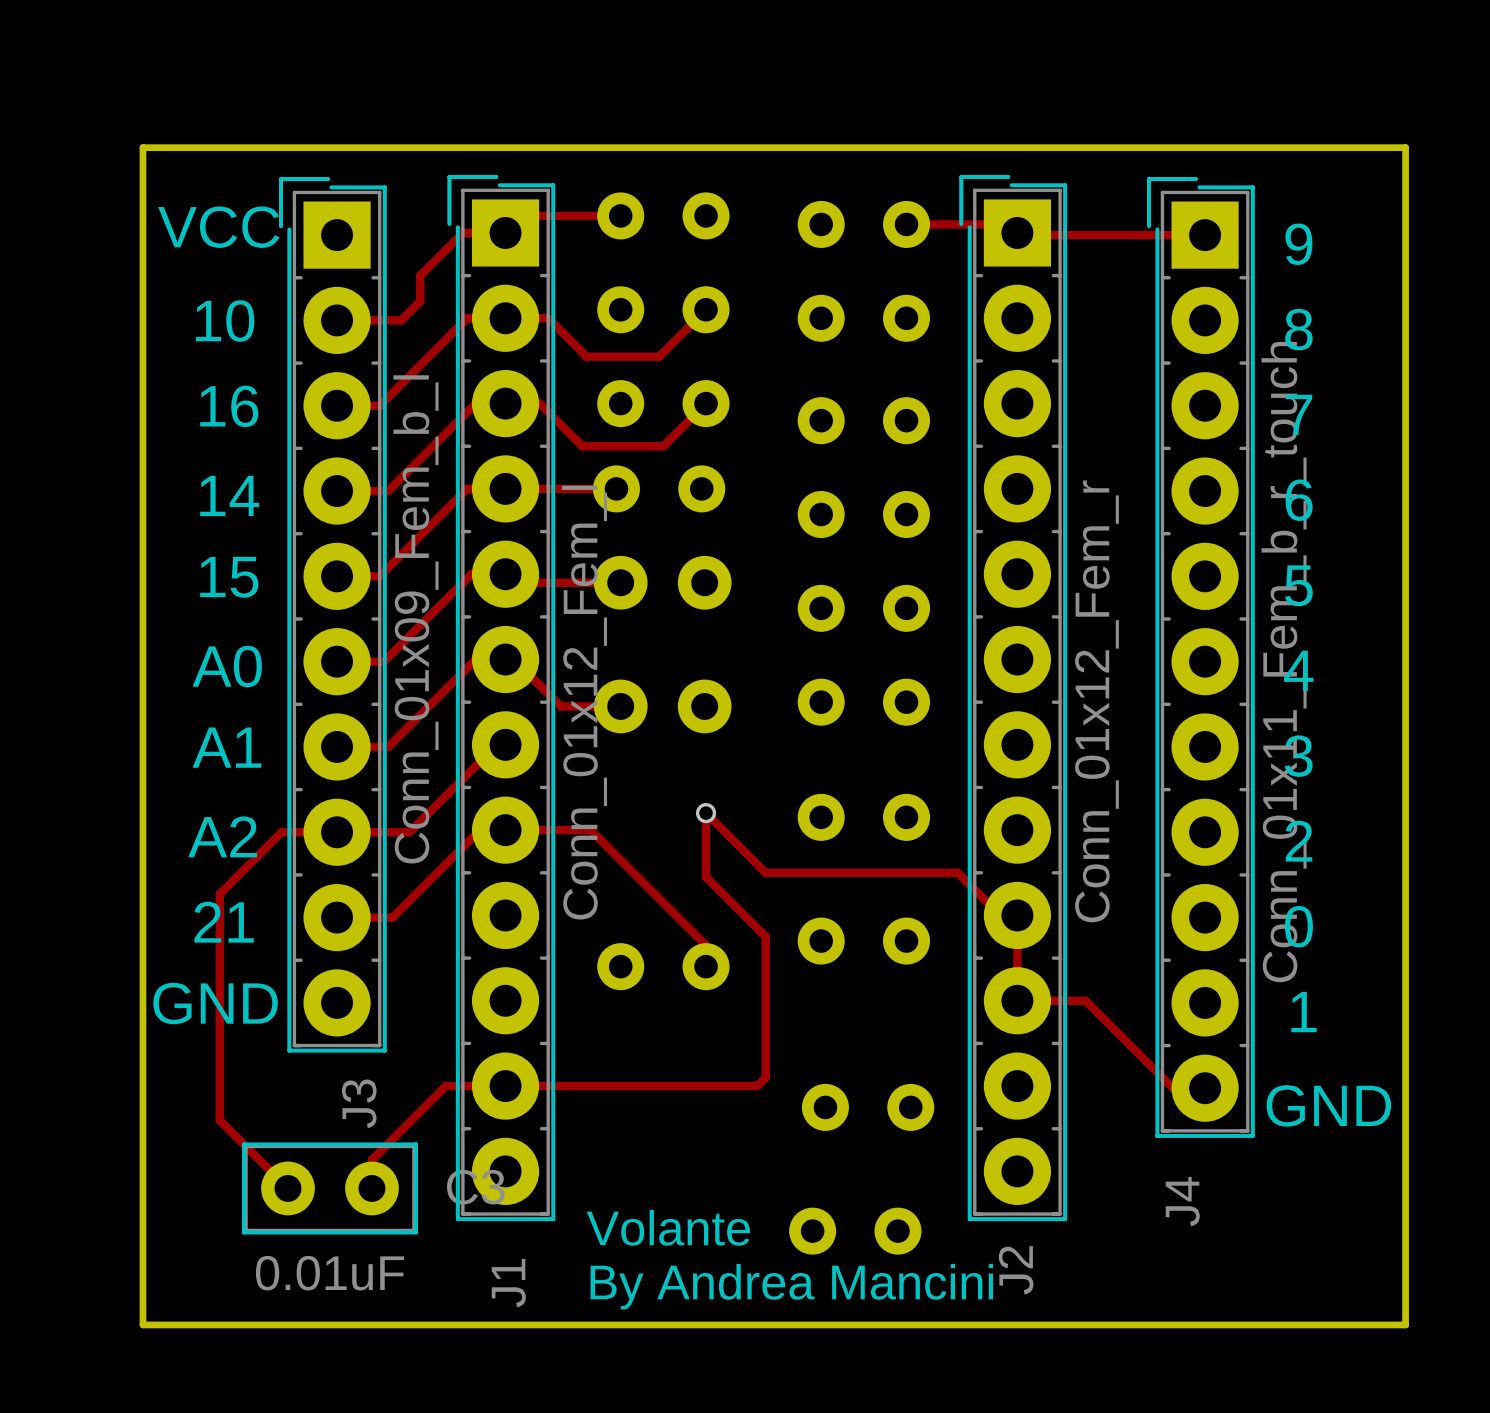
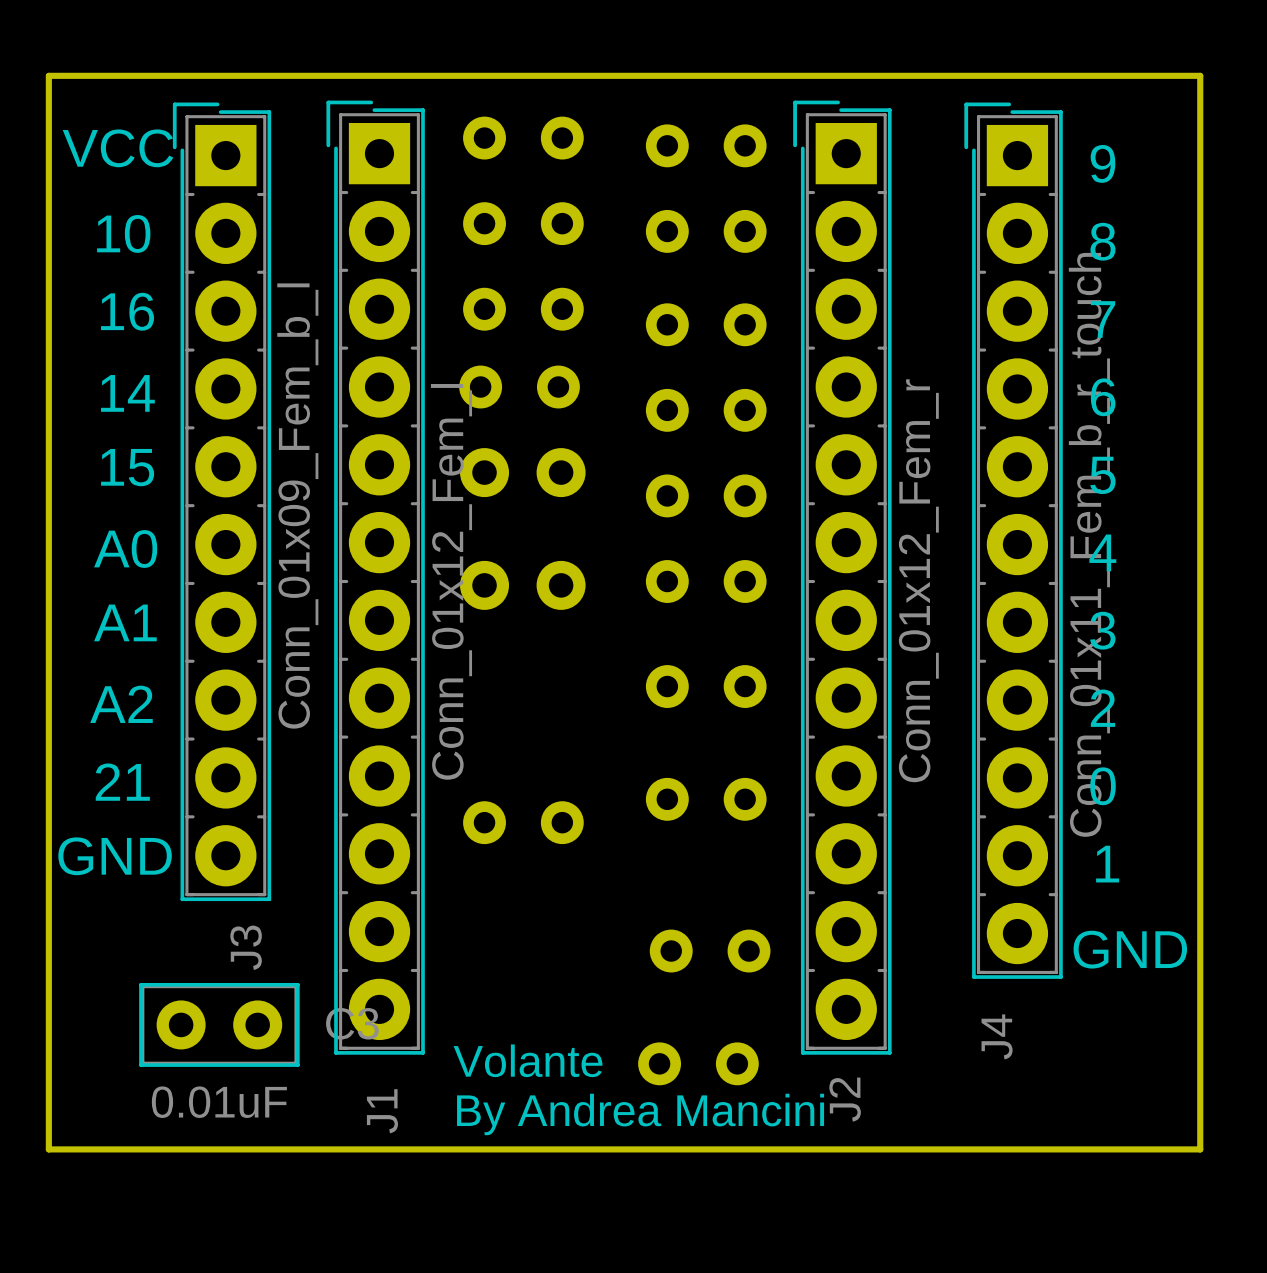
track: (620, 215) (522, 215) (505, 232) (462, 232) (420, 275) (420, 301) (401, 320) (337, 320) -> none
track: (906, 224) (1008, 224) (1019, 235) (1205, 235) -> none
track: (706, 309) (659, 356) (586, 356) (548, 318) (467, 318) (379, 405) (337, 405) -> none
track: (706, 403) (663, 446) (582, 446) (539, 403) (475, 403) (388, 491) (337, 491) -> none
track: (616, 488) (467, 488) (379, 576) (337, 576) -> none
track: (620, 582) (514, 582) (505, 574) (471, 574) (383, 661) (337, 661) -> none
track: (620, 706) (561, 706) (514, 659) (475, 659) (388, 746) (337, 746) -> none
track: (505, 744) (497, 744) (409, 832) (281, 832) (219, 894) (219, 1120) (288, 1188) -> none
via: (706, 813) -> none
track: (337, 917) (392, 917) (479, 830) (590, 830) (706, 945) (706, 966) -> none
track: (1205, 1088) (1173, 1088) (1085, 1000) (1017, 1000) (1017, 915) (1000, 915) (957, 872) (765, 872) (706, 813) (706, 877) (765, 936) (765, 1077) (757, 1086) (445, 1086) (371, 1159) (371, 1188) -> none

